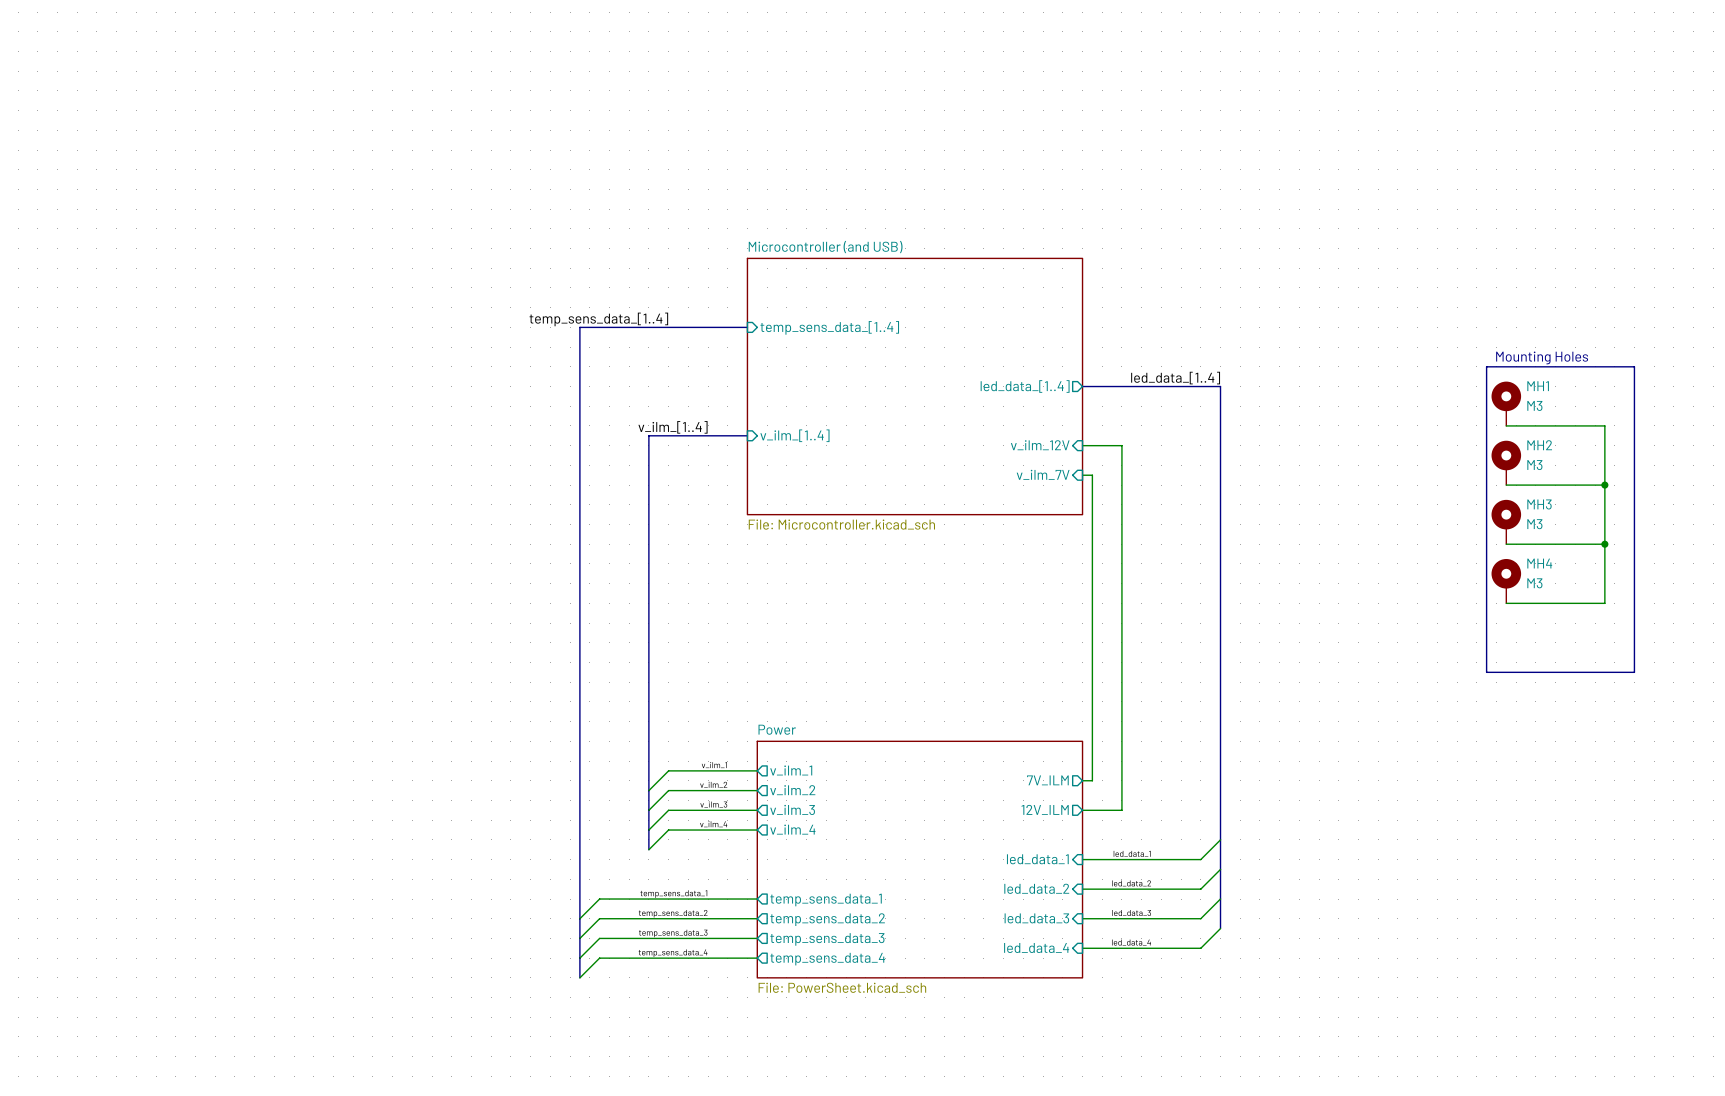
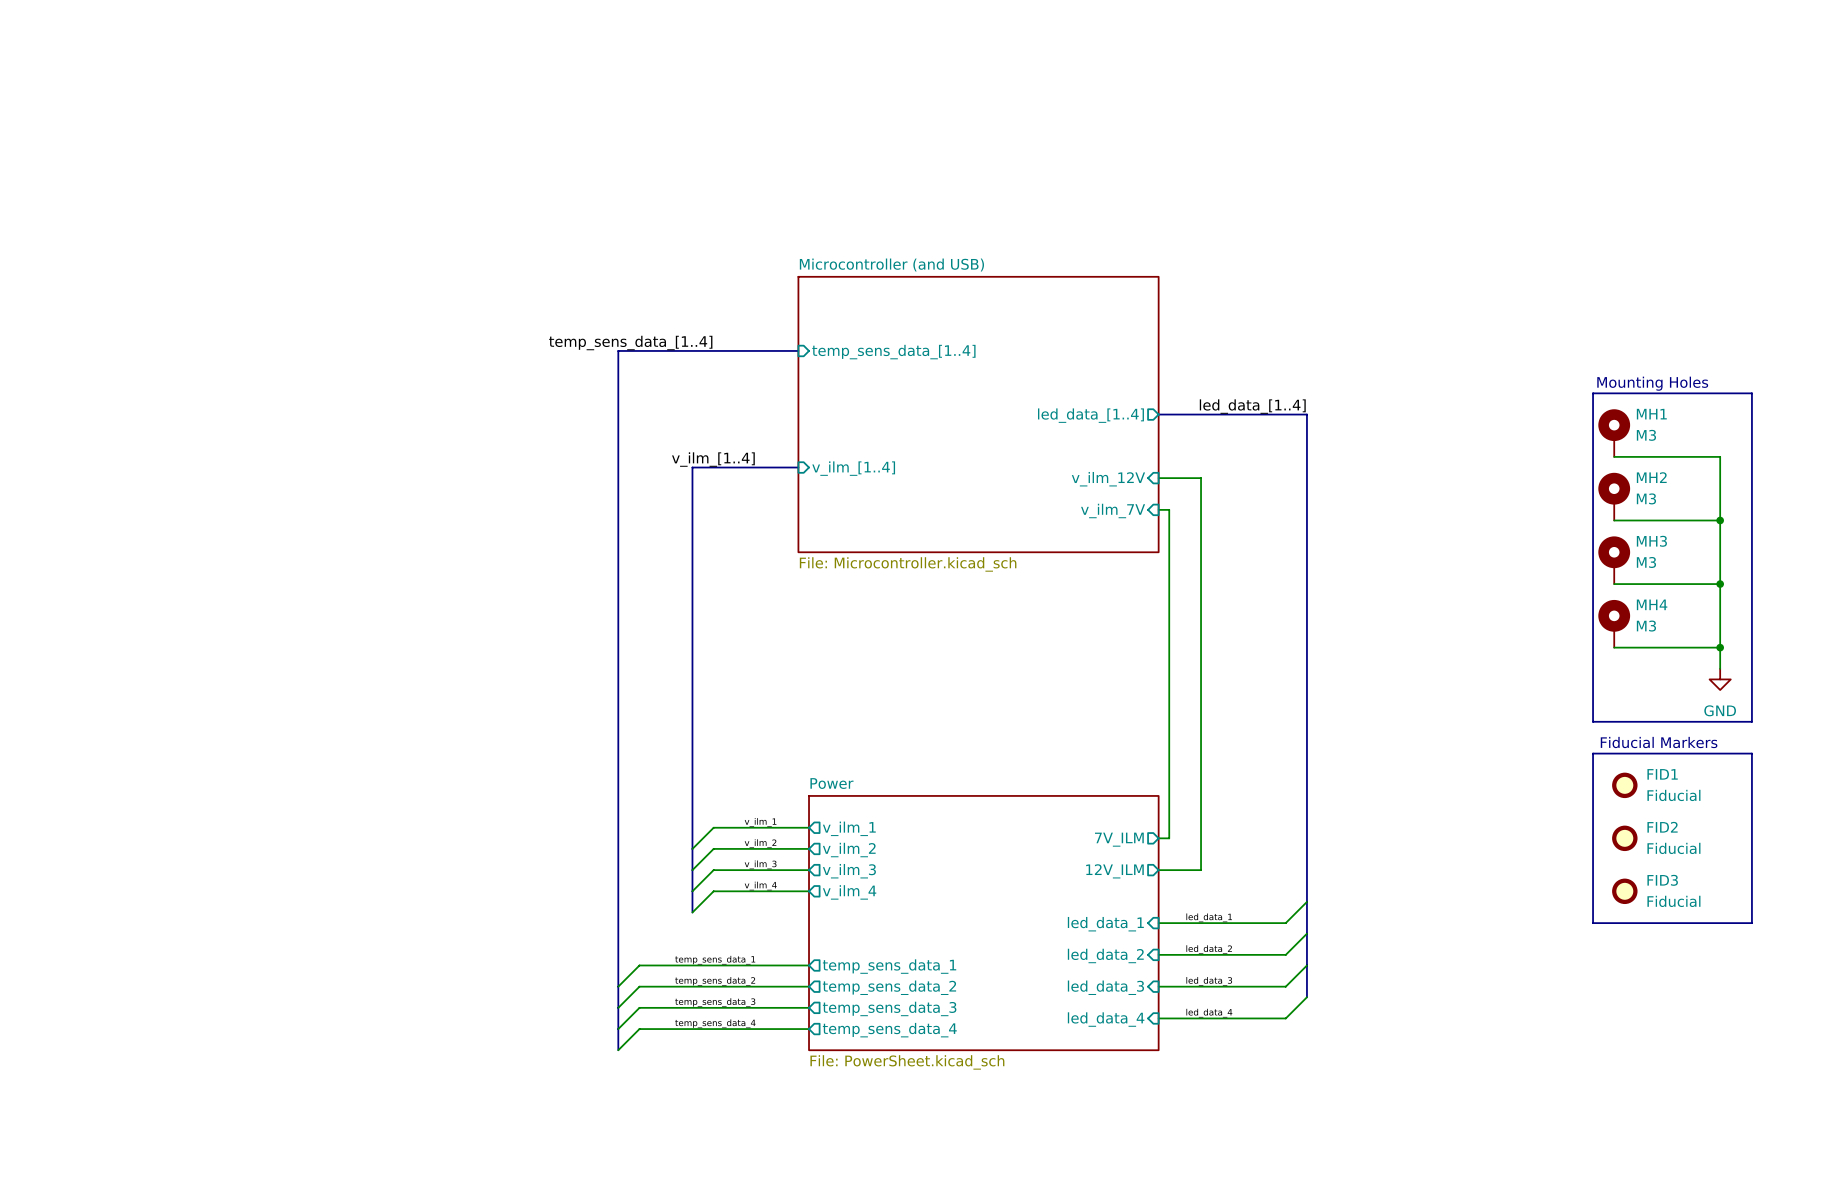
wire: none -> (1720, 647) (1720, 668)
junction: none -> (1720, 647)
power symbol: none -> GND (1720, 679)
text: none -> Fiducial Markers (1659, 742)
line: none -> (1593, 753) (1751, 753) (1751, 923) (1593, 923) (1593, 753)
FID1: none -> Fiducial (1624, 785)
FID2: none -> Fiducial (1624, 838)
FID3: none -> Fiducial (1624, 891)

